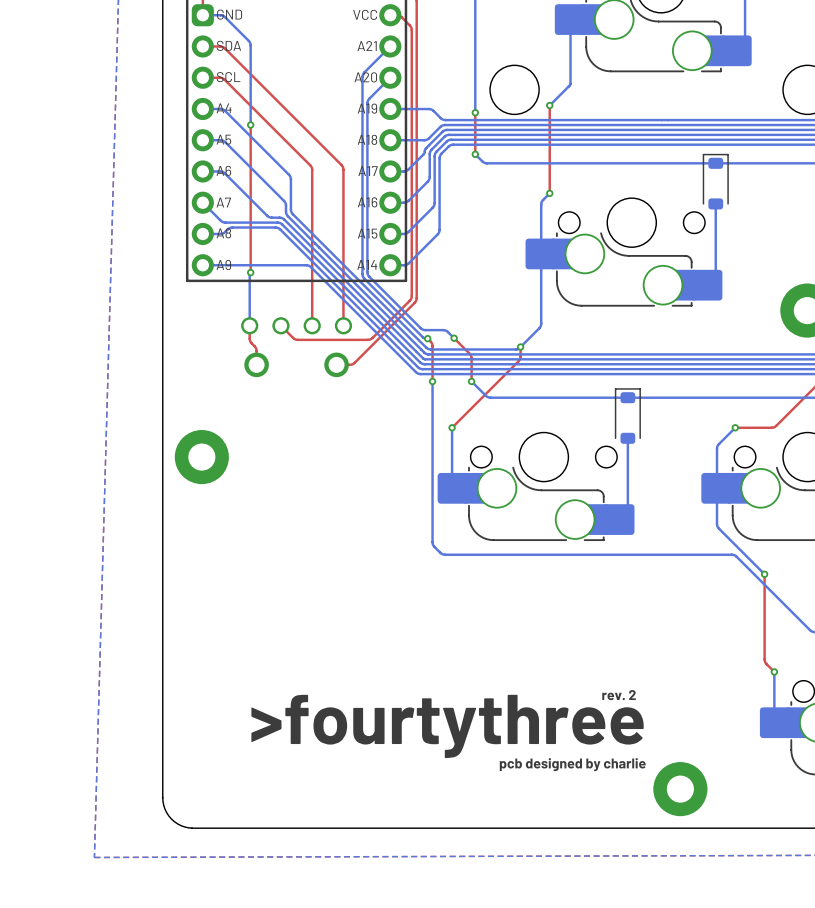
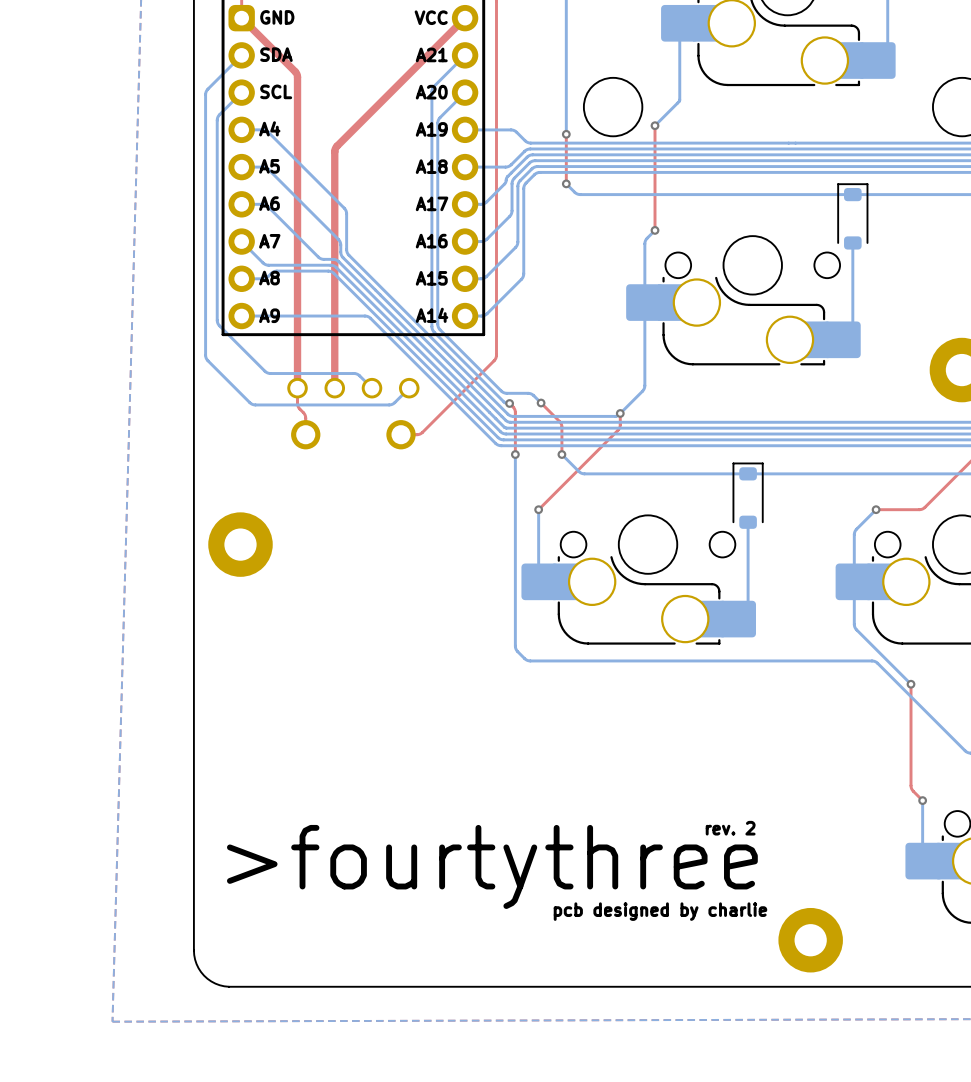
bottom track: (202, 15) (223, 16) (250, 43) (250, 125) -> none
top track: none -> (241, 18) (297, 75) (297, 388)
top track: (396, 15) (401, 17) (411, 29) (411, 298) (369, 339) (296, 339) (280, 325) -> (465, 18) (335, 148) (334, 388)
bottom track: none -> (241, 55) (205, 93) (206, 359) (249, 402) (254, 404) (390, 404) (409, 388)
top track: (202, 46) (224, 48) (342, 166) (343, 325) -> none
bottom track: none -> (241, 92) (217, 119) (217, 323) (267, 372) (354, 373) (372, 388)
top track: (202, 77) (224, 79) (311, 167) (312, 325) -> none
via: (250, 125) -> none
bottom track: (250, 272) (249, 325) -> none
via: (250, 272) -> none

